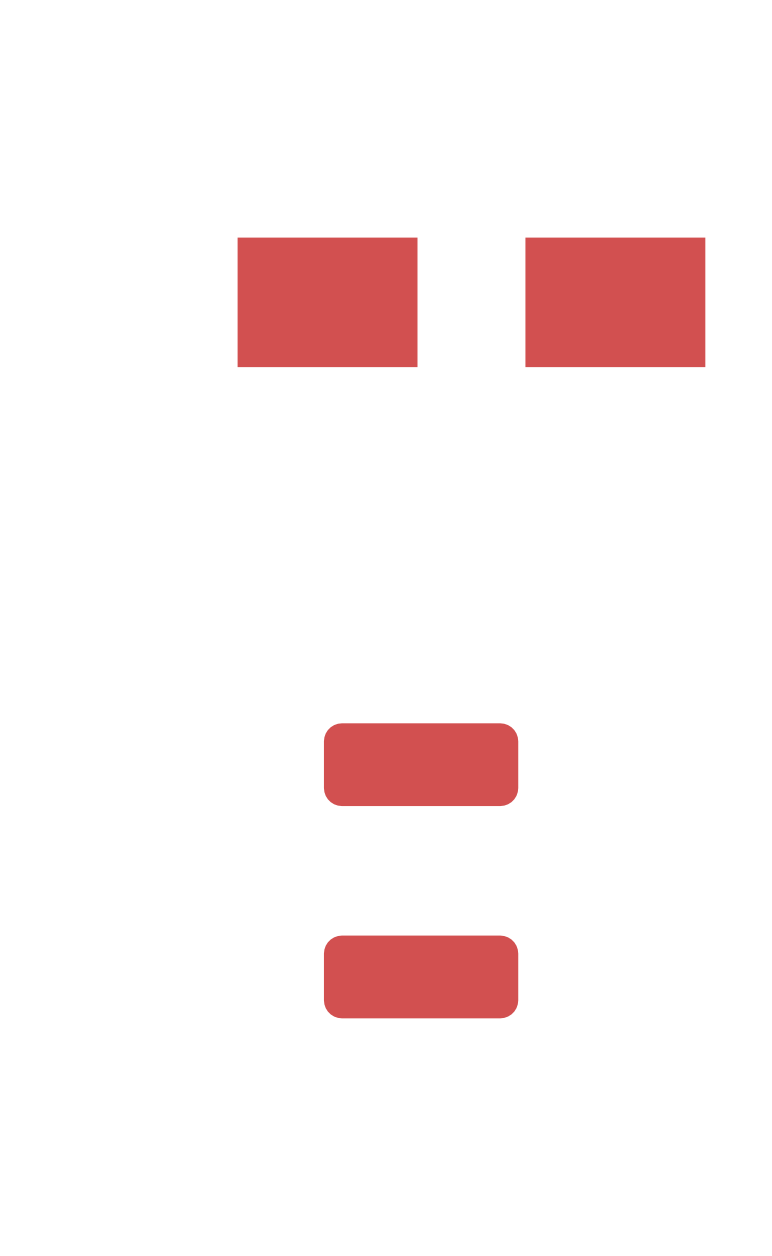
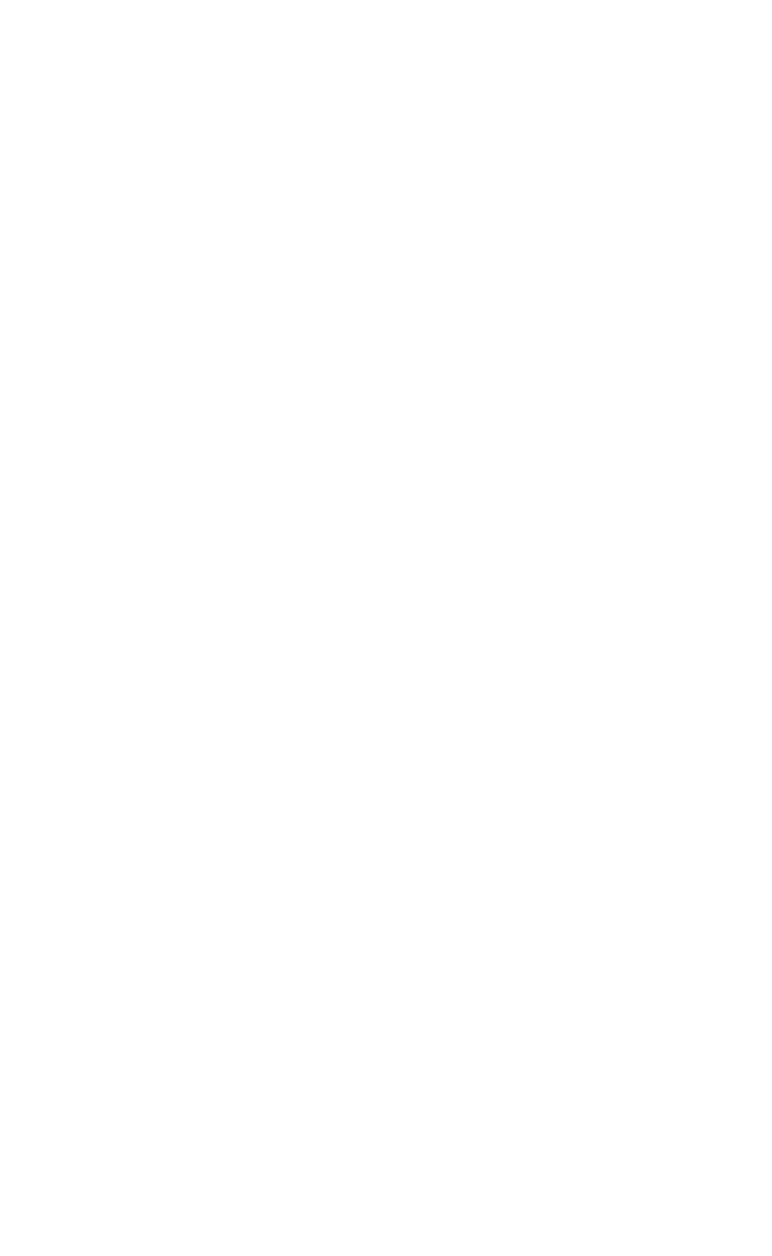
part: (471, 302) -> none
part: (421, 870) -> none

